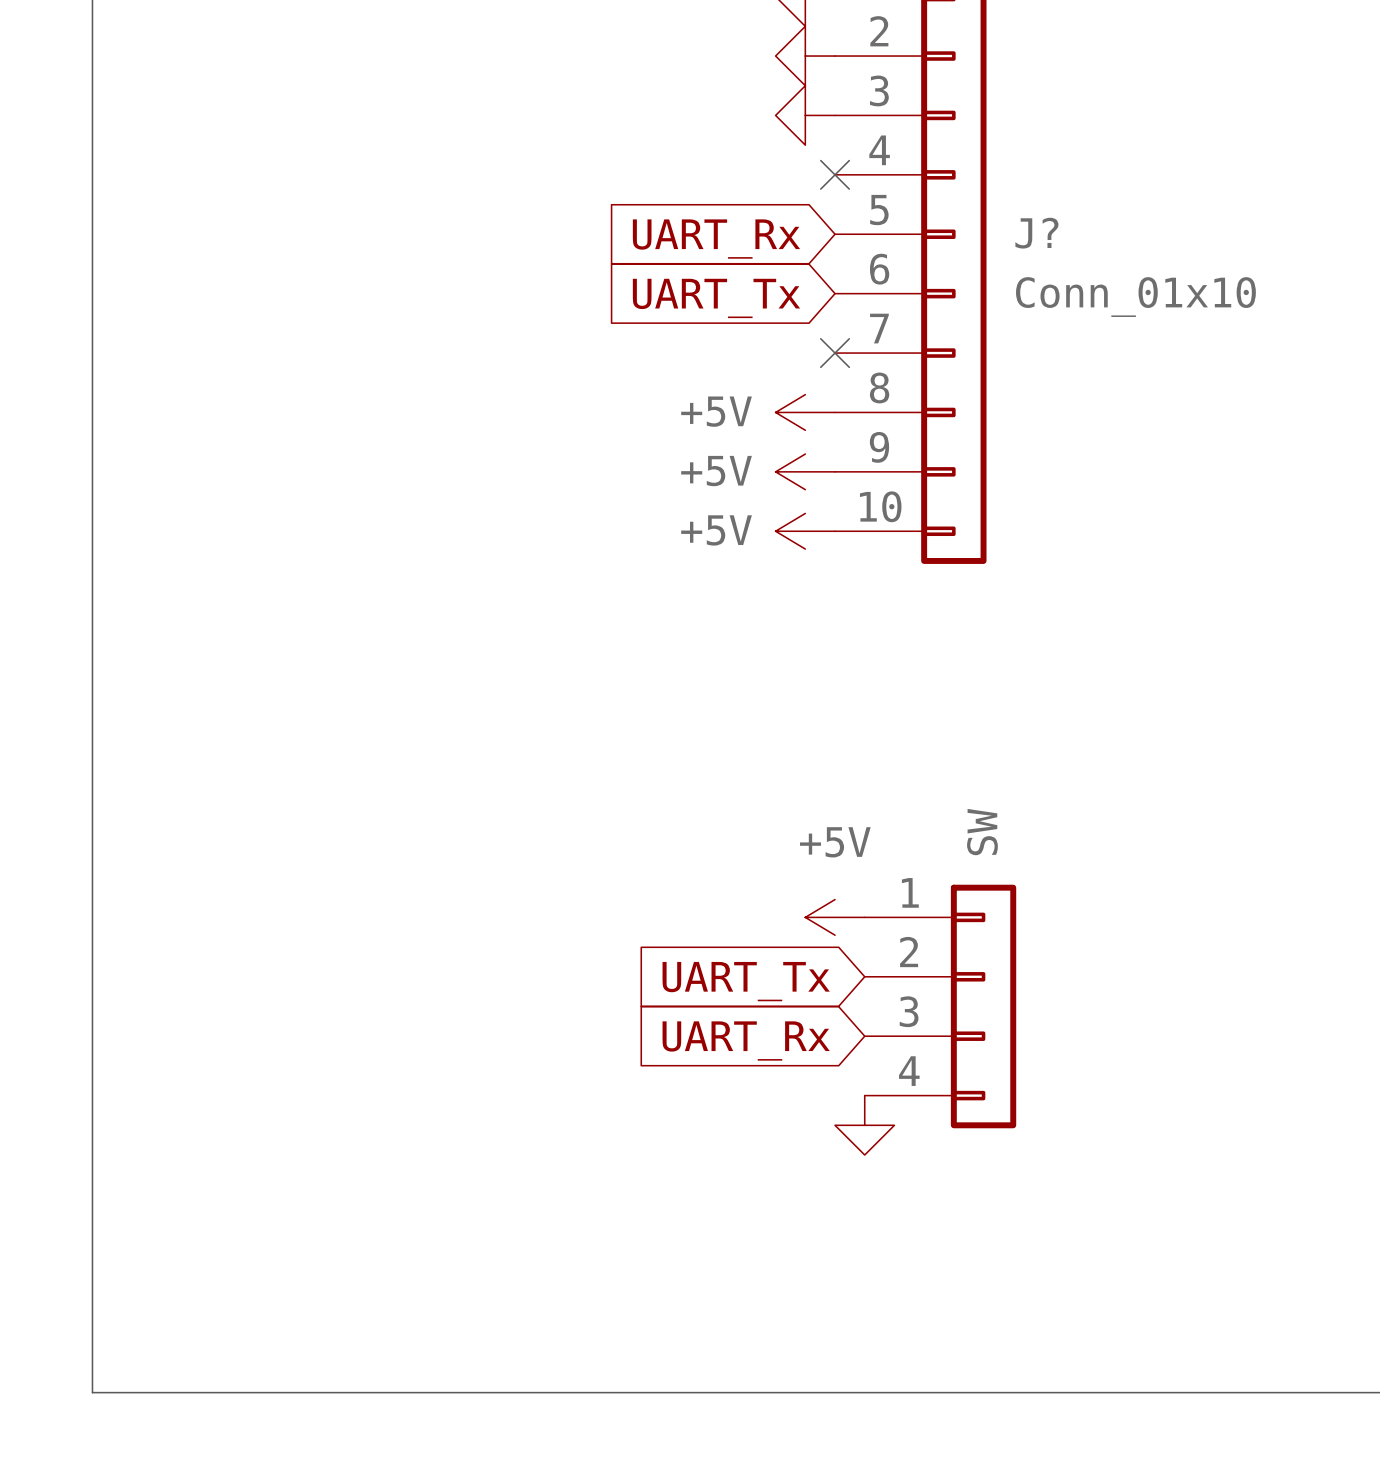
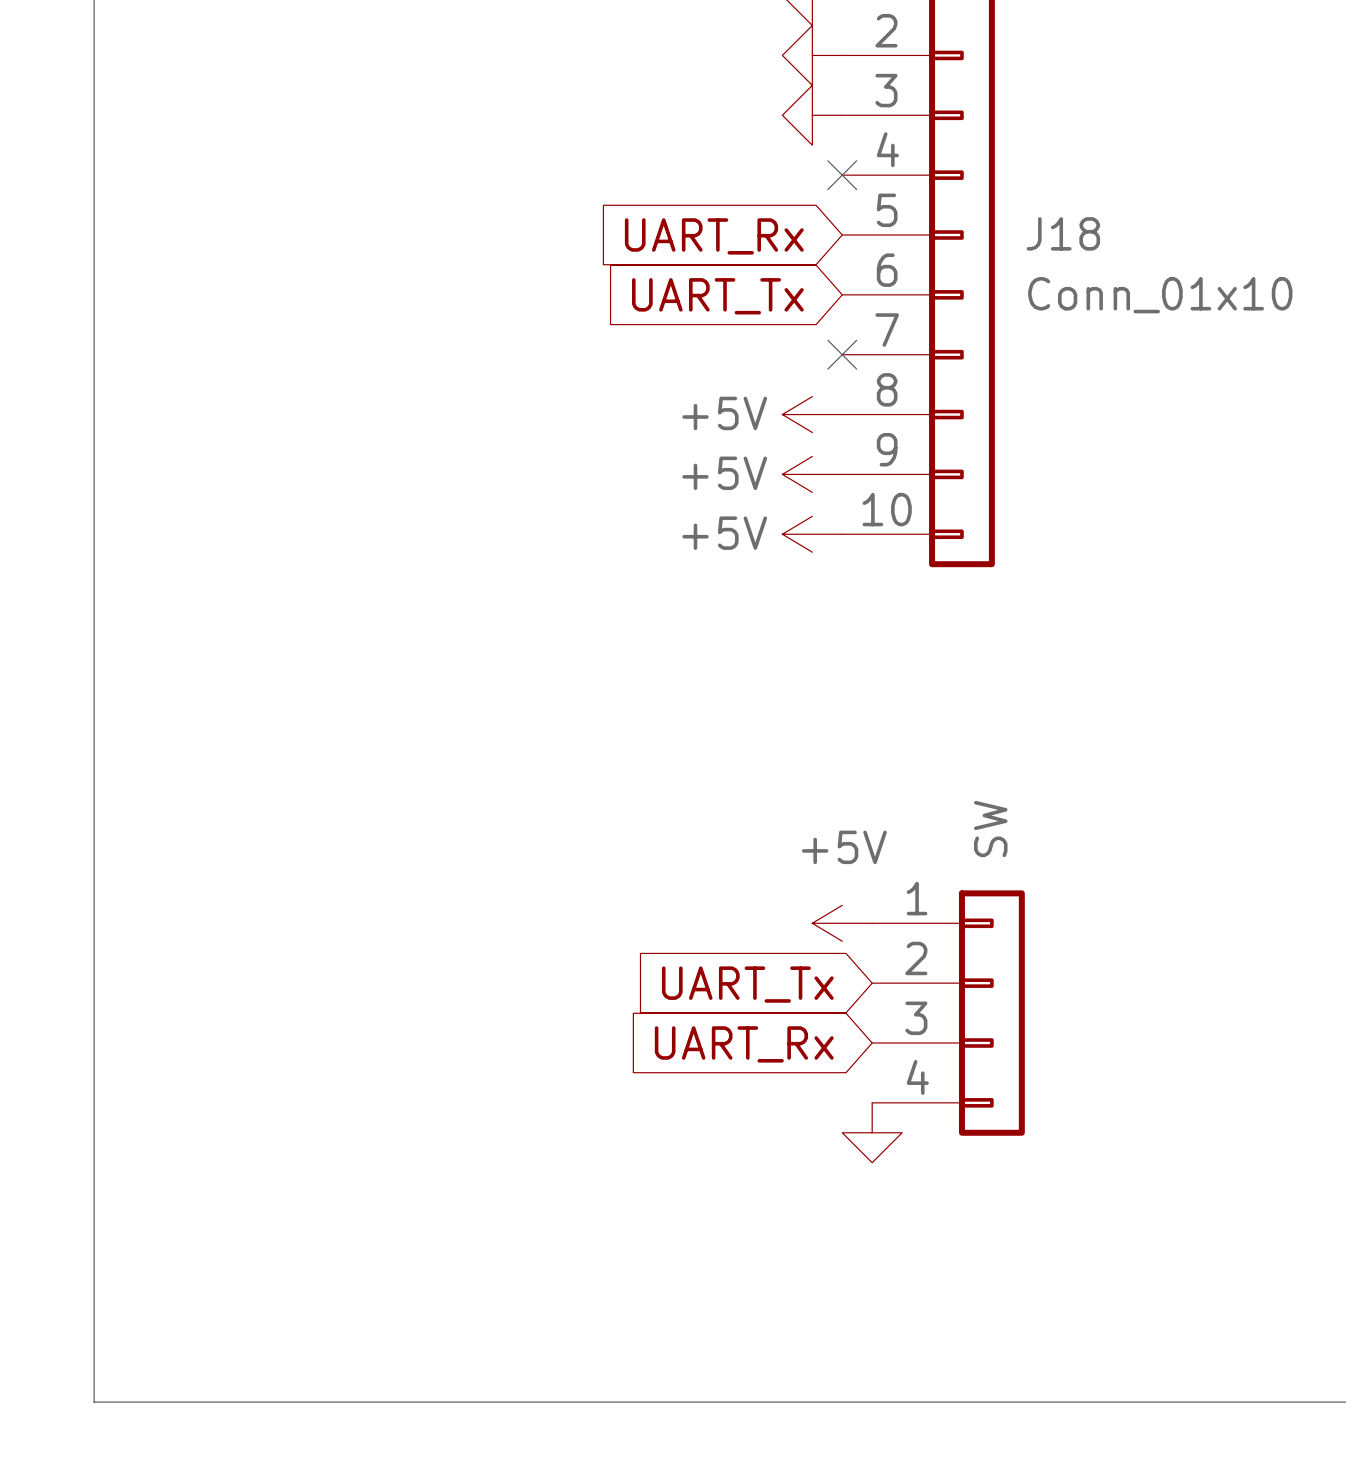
J? name: J? (1036, 233) -> J18 (1063, 233)

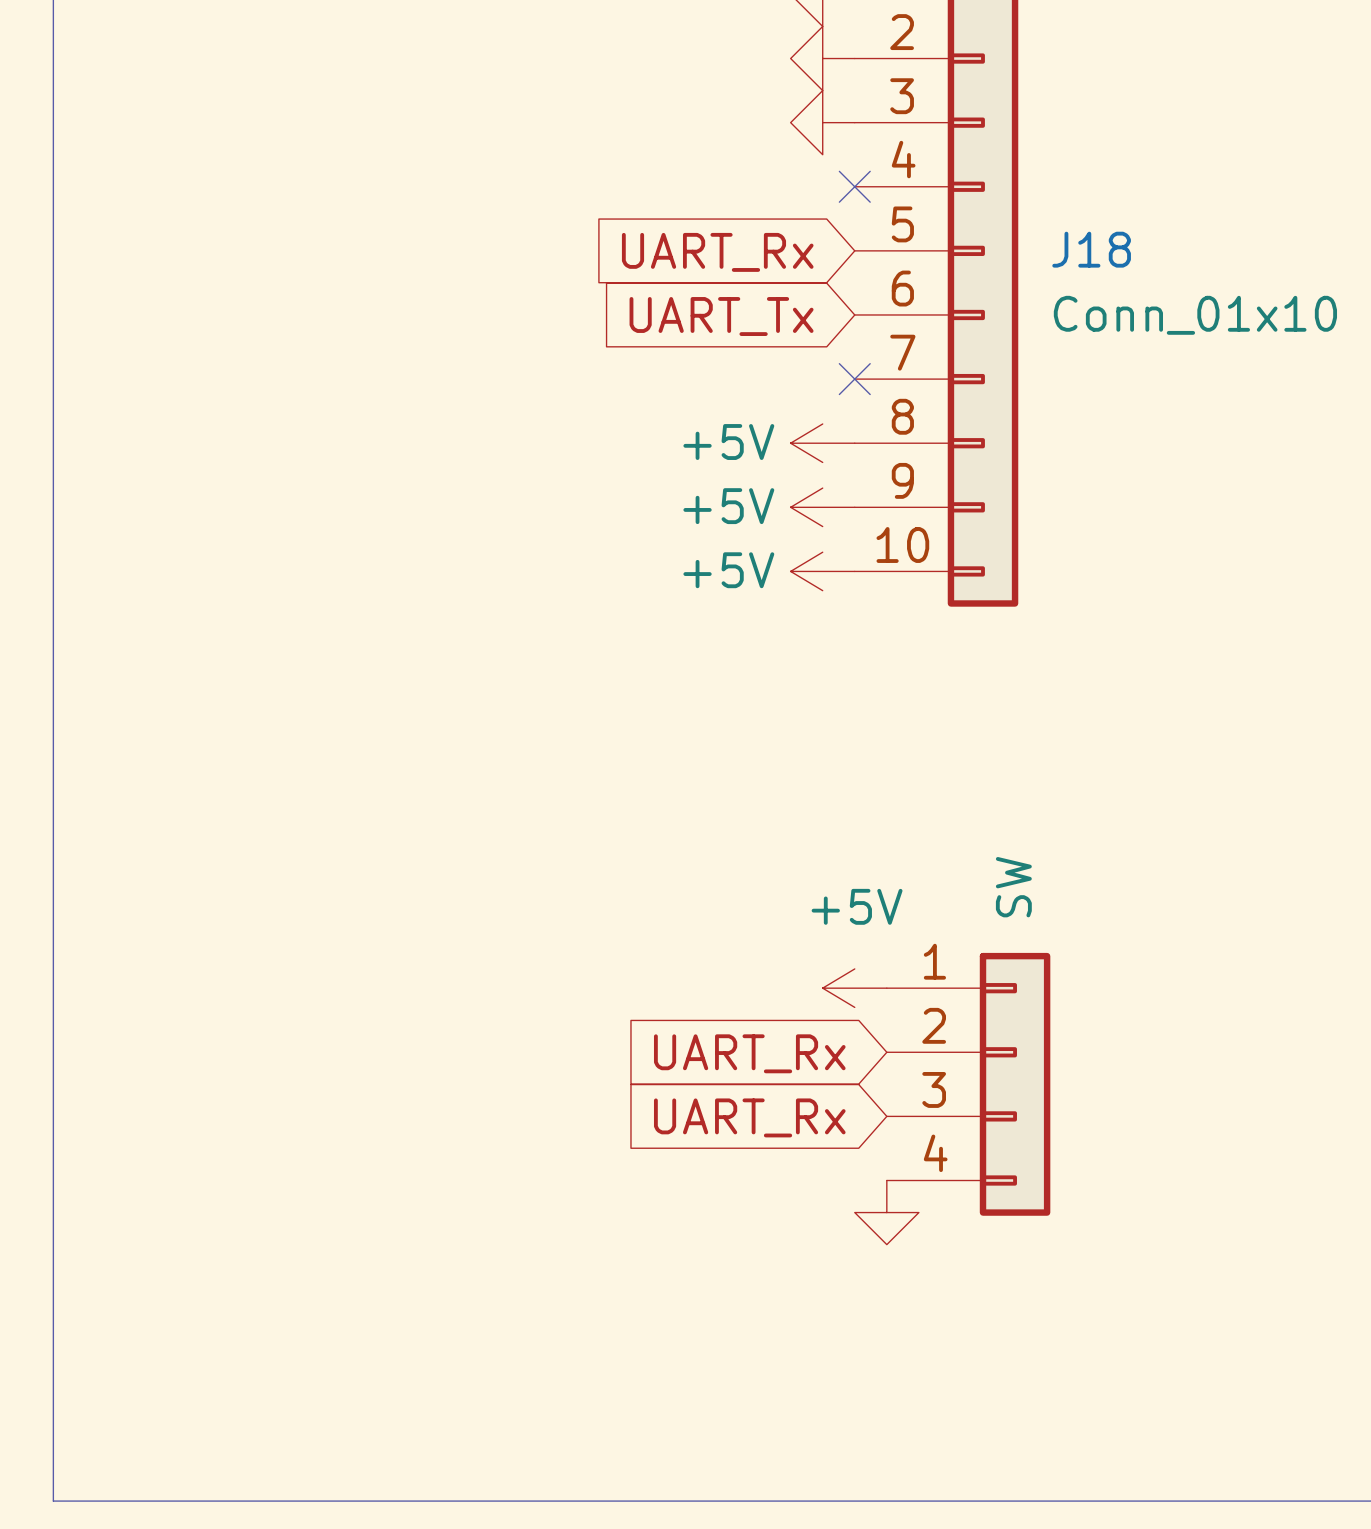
global label: UART_Tx (747, 984) -> UART_Rx (749, 1053)

